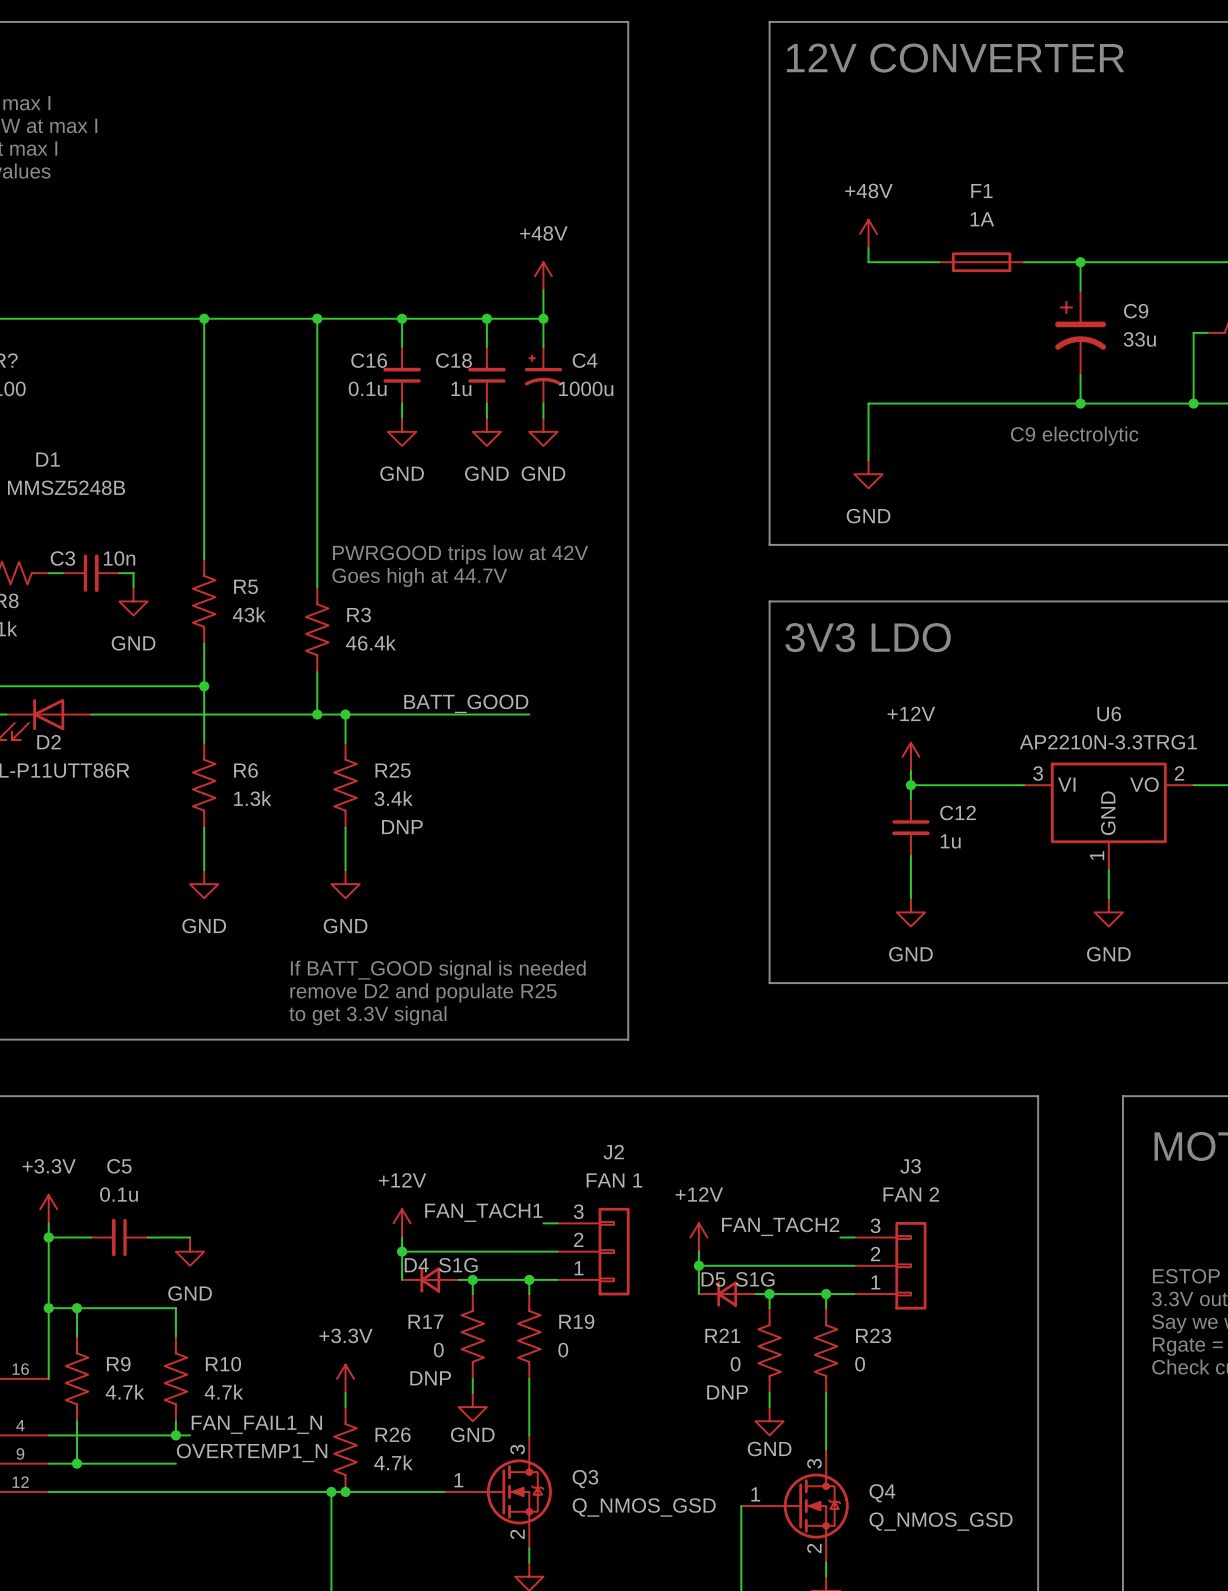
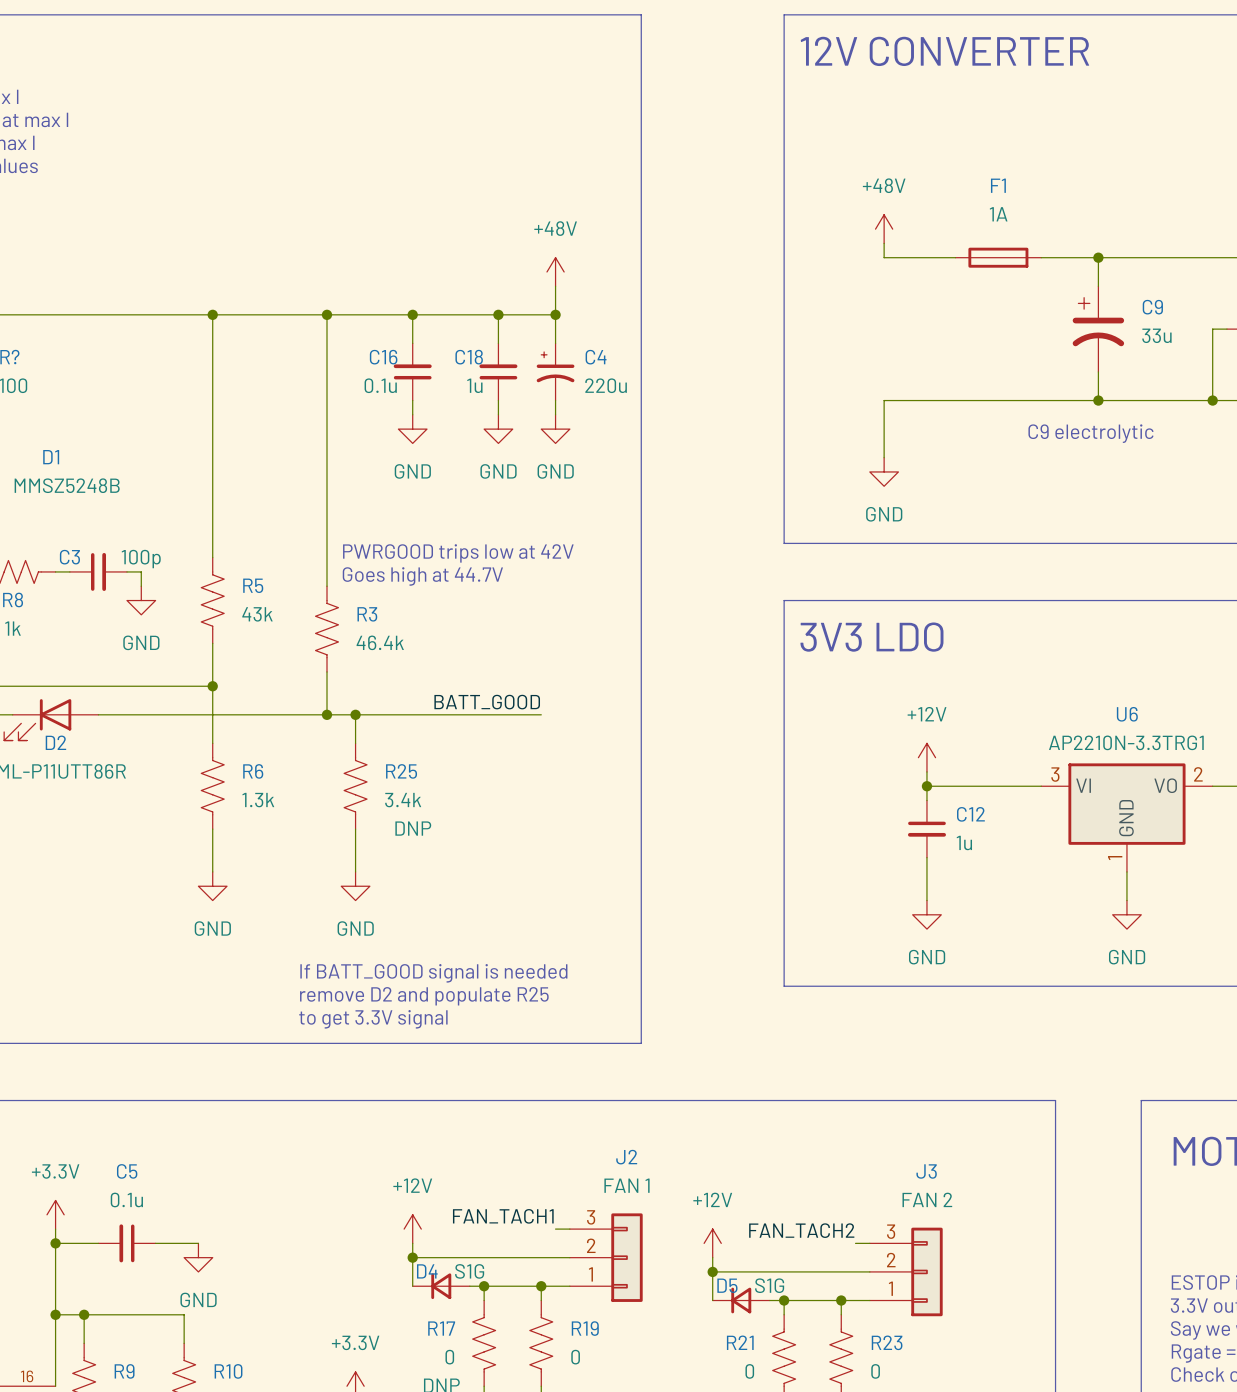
C4 value: 1000u (586, 388) -> 220u (606, 385)
C3 value: 10n (119, 558) -> 100p (141, 559)

